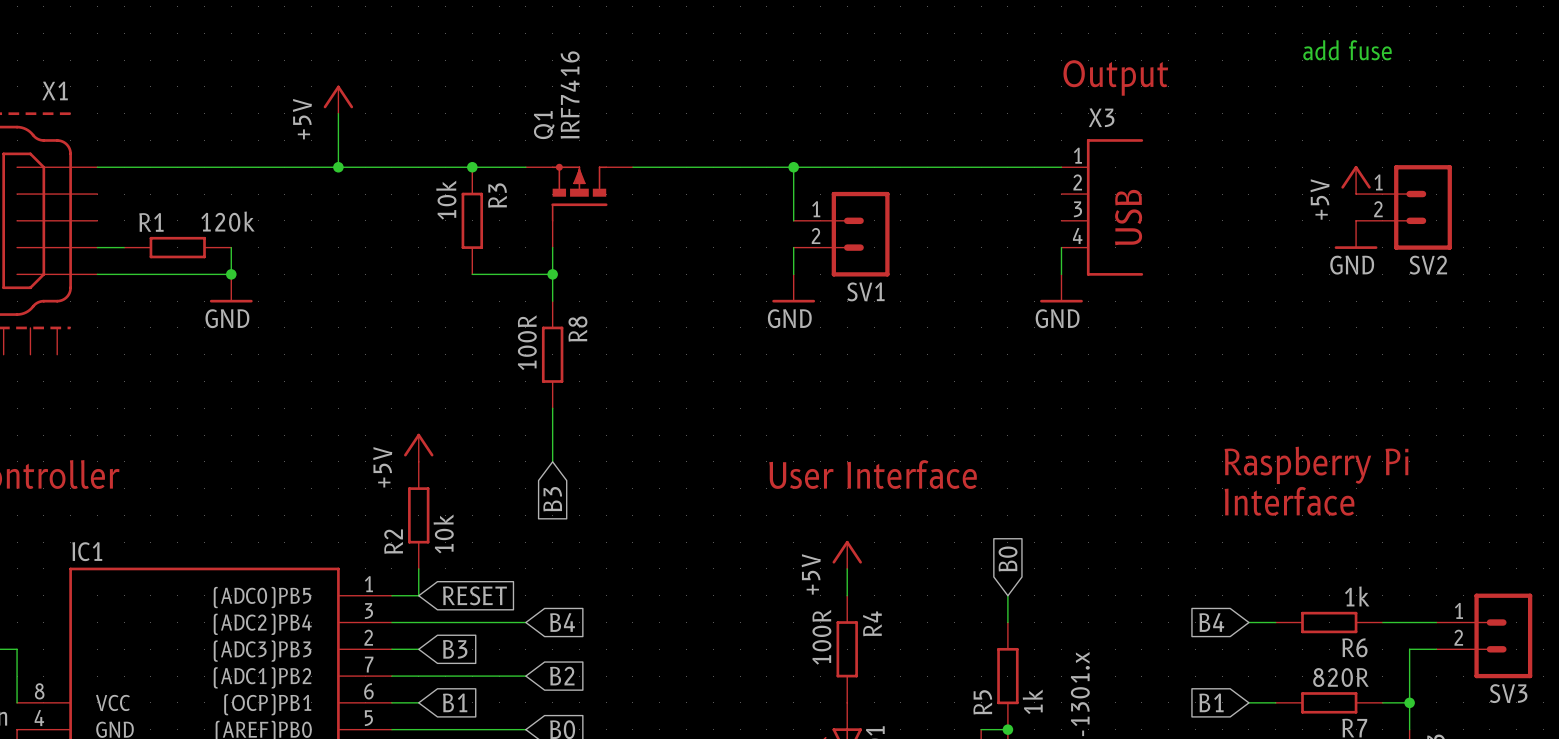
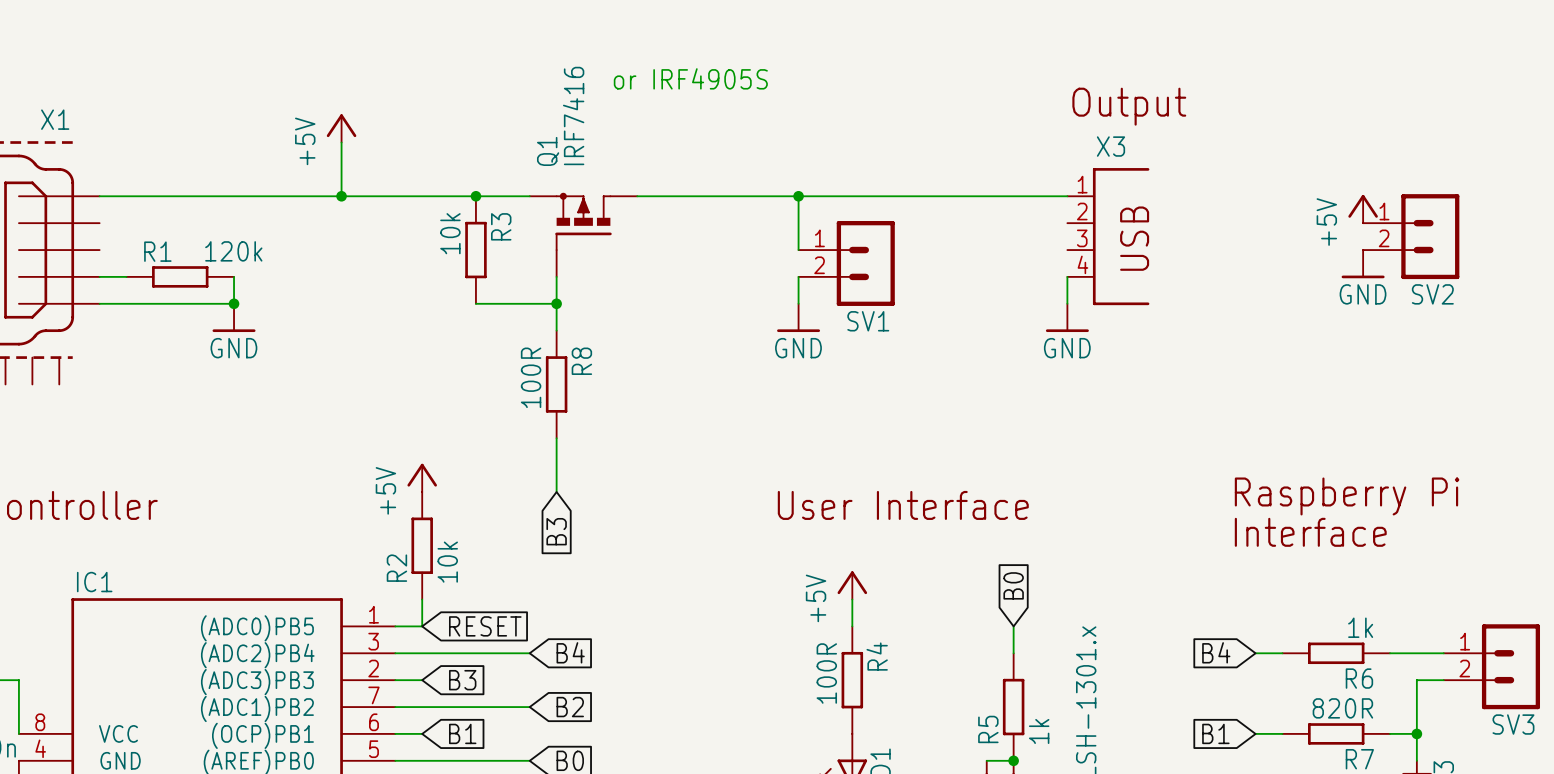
text: none -> or IRF4905S (690, 78)
text: add fuse (1347, 50) -> none

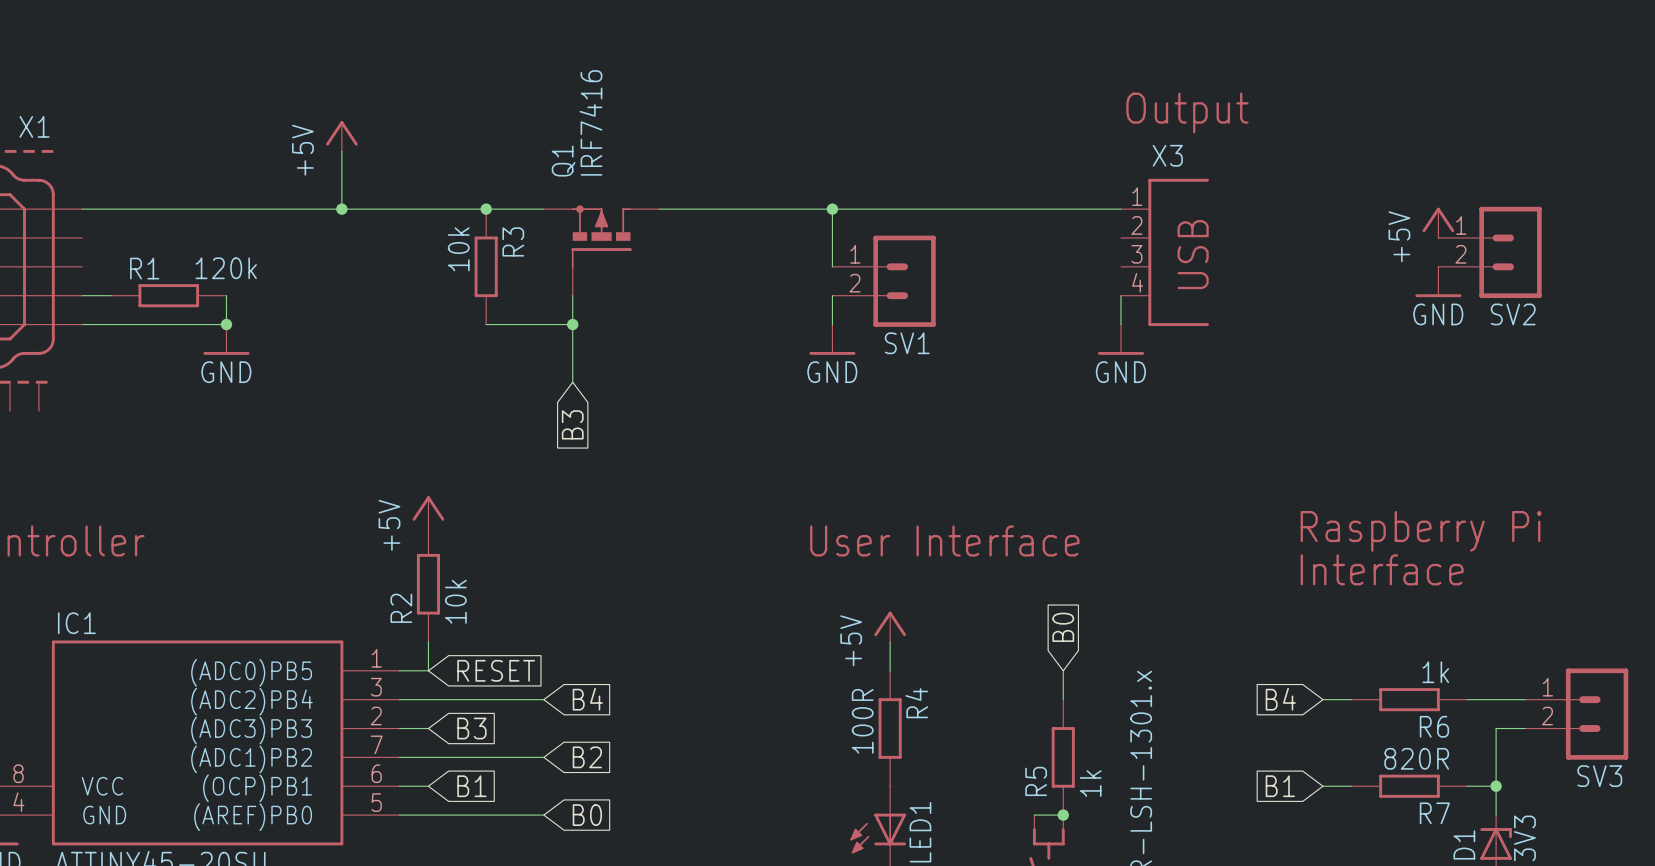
text: or IRF4905S (690, 78) -> none
R8: 100R (556, 384) -> none
wire: (556, 438) (556, 491) -> none
global label position: B3 (556, 531) -> B3 (572, 424)

